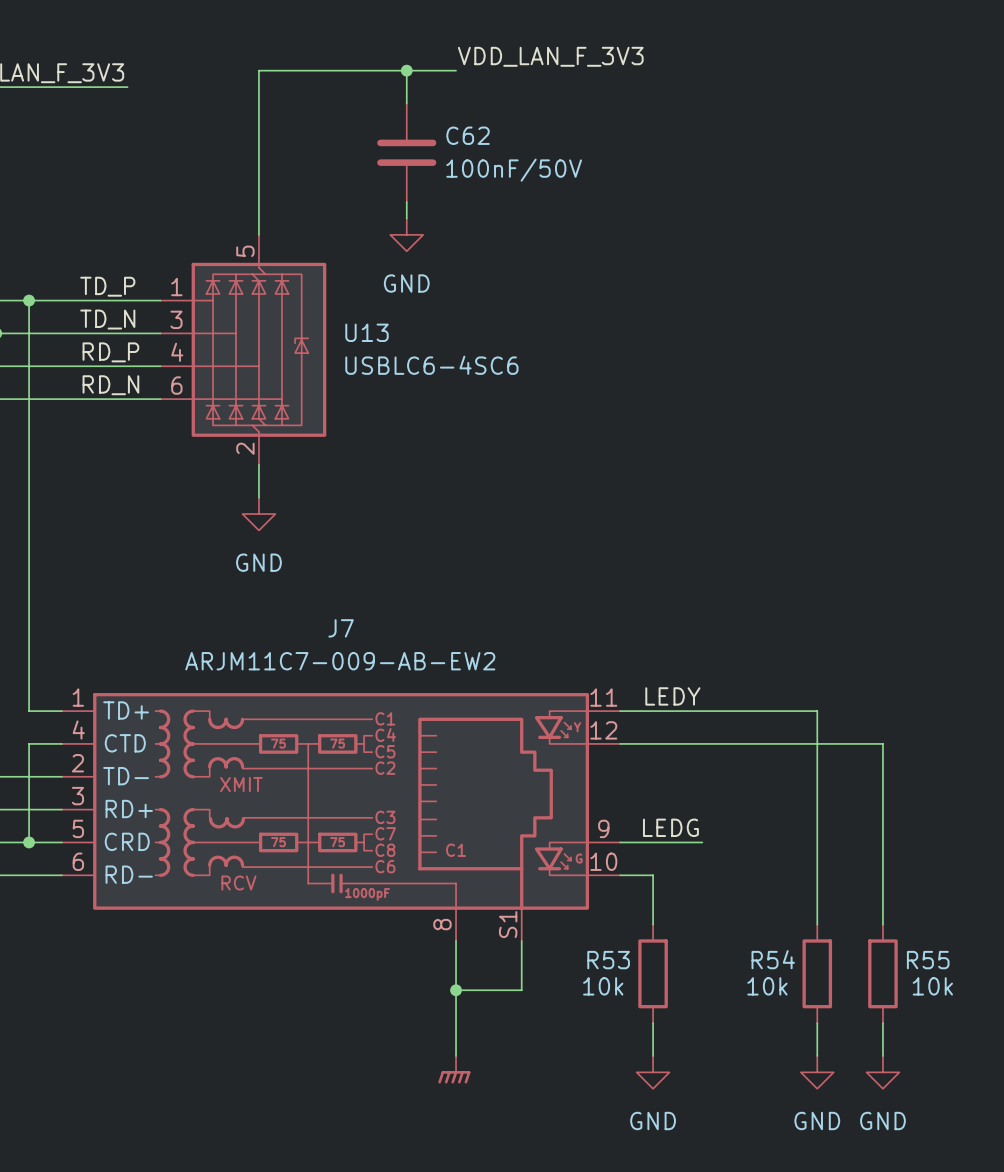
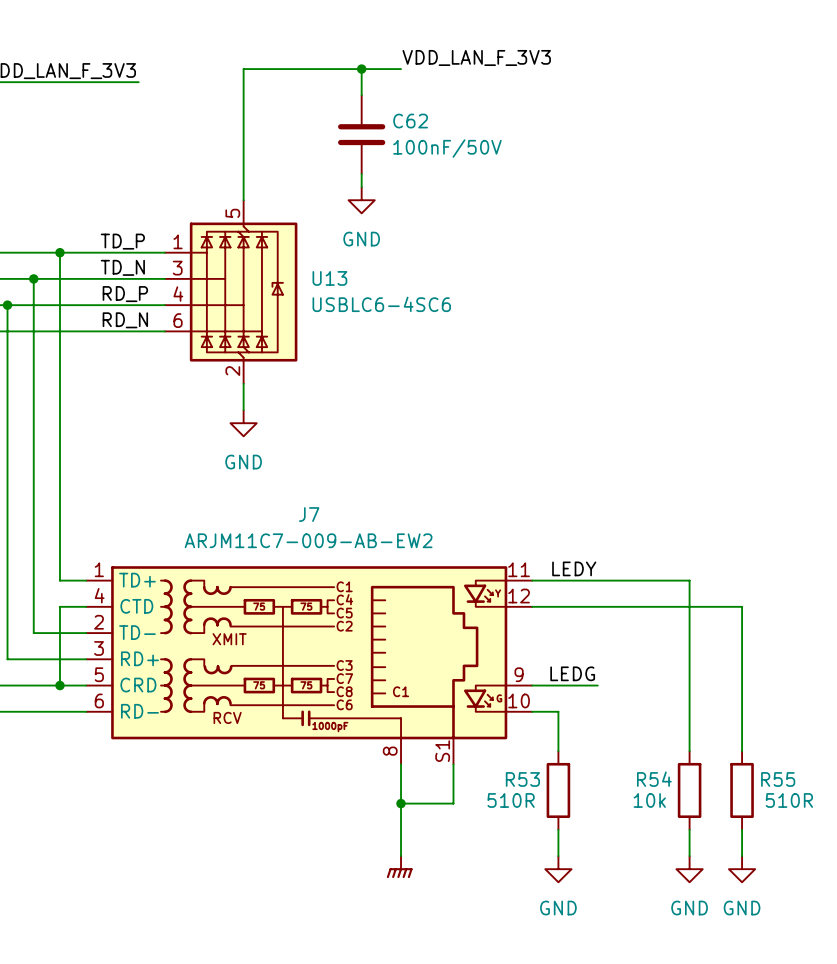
R53 value: 10k (603, 986) -> 510R (511, 800)
R55 value: 10k (932, 986) -> 510R (789, 800)

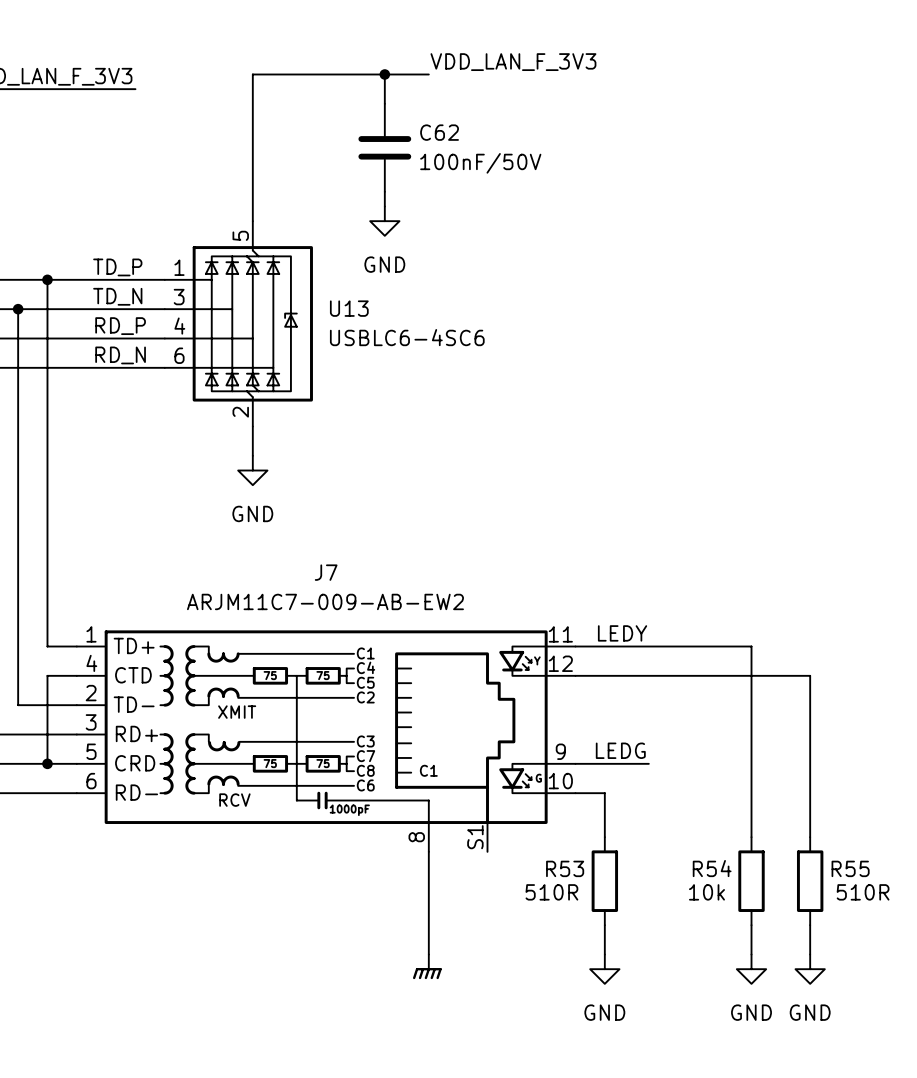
wire: (453, 764) (453, 803) (401, 803) -> none
junction: (401, 803) -> none

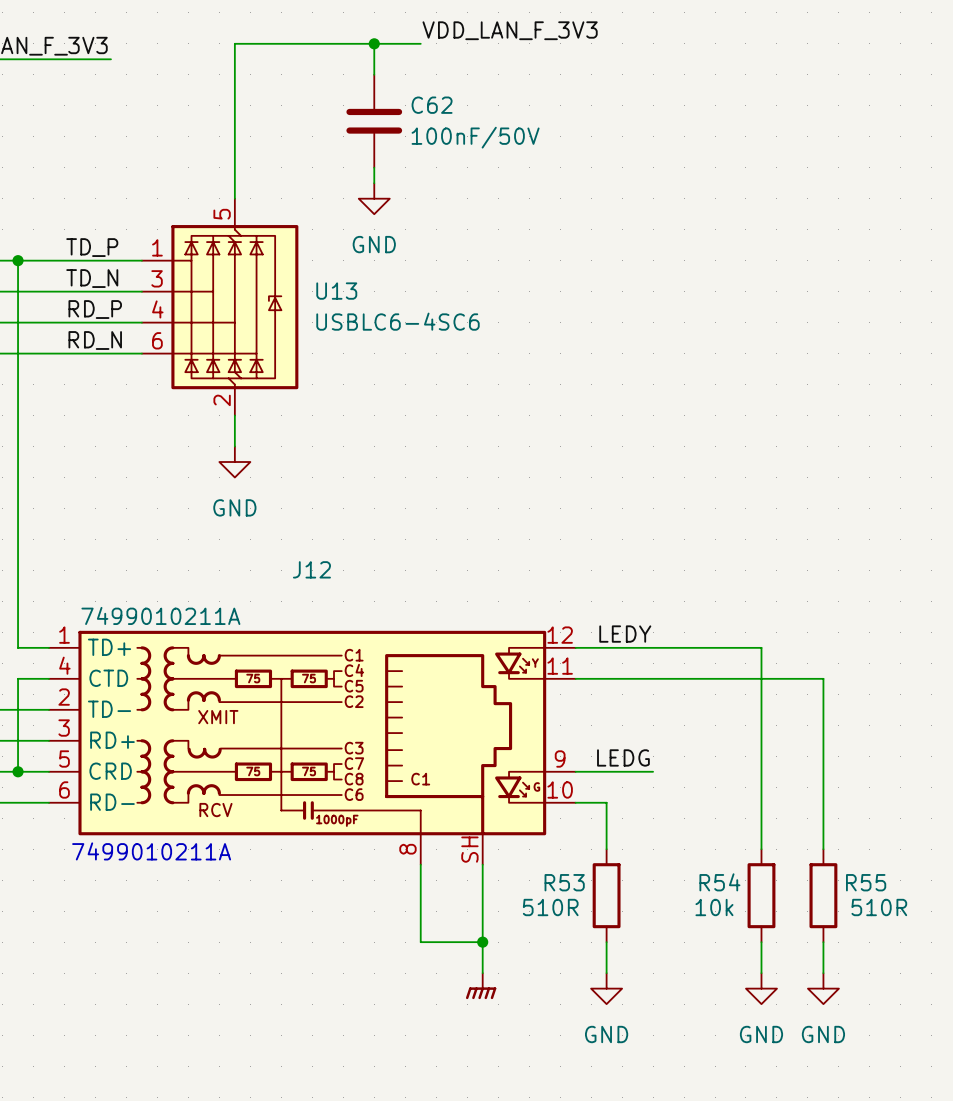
J7 name: J7 (326, 572) -> J12 (311, 569)
J7 value: ARJM11C7-009-AB-EW2 (325, 601) -> 7499010211A (160, 615)
J7 pin number: 11 (560, 634) -> 12 (560, 635)
J7 pin number: 12 (560, 663) -> 11 (560, 666)
J7 pin number: S1 (475, 837) -> SH (469, 849)
text: none -> 7499010211A (151, 851)
wire: none -> (482, 864) (482, 973)
wire: (428, 925) (428, 954) -> (420, 942) (482, 942)
junction: none -> (482, 942)
power symbol position: (427, 966) -> (481, 986)

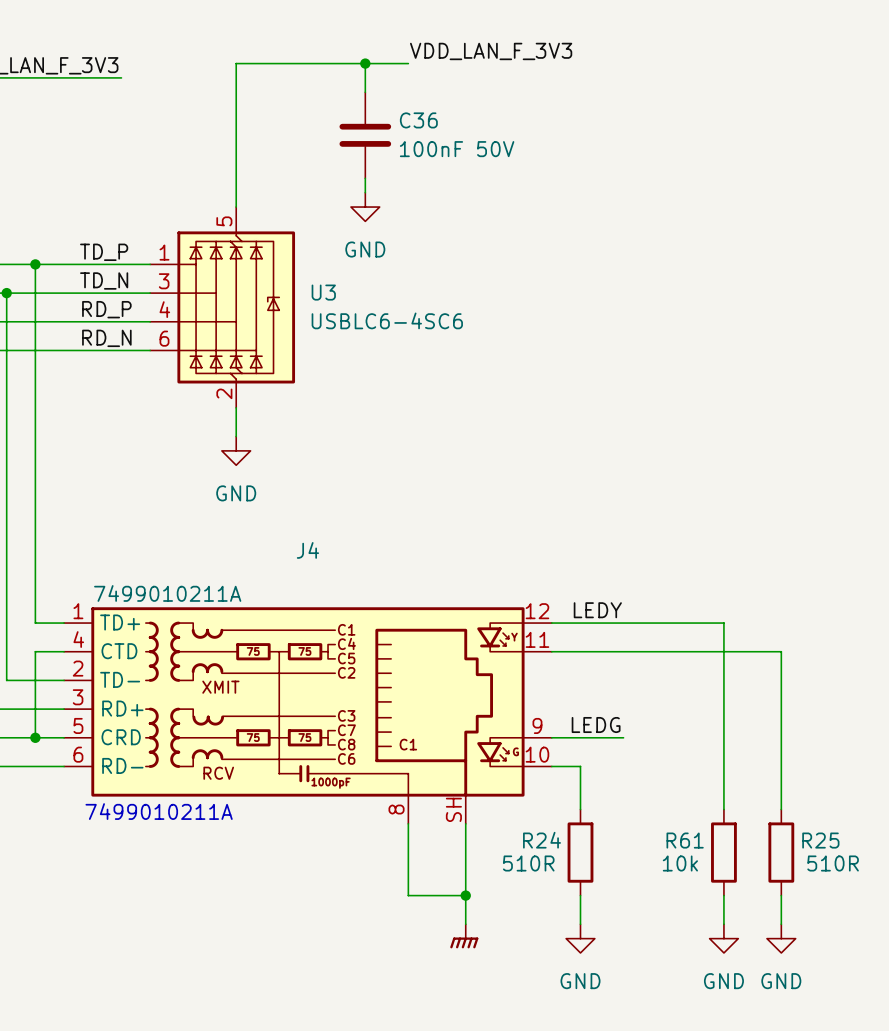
C62 name: C62 (432, 105) -> C36 (418, 120)
C62 value: 100nF/50V (475, 137) -> 100nF 50V (457, 149)
U13 name: U13 (336, 291) -> U3 (323, 292)
J12 name: J12 (311, 569) -> J4 (307, 550)
R53 name: R53 (564, 882) -> R24 (542, 840)
R54 name: R54 (719, 882) -> R61 (685, 840)
R55 name: R55 (866, 882) -> R25 (820, 840)

